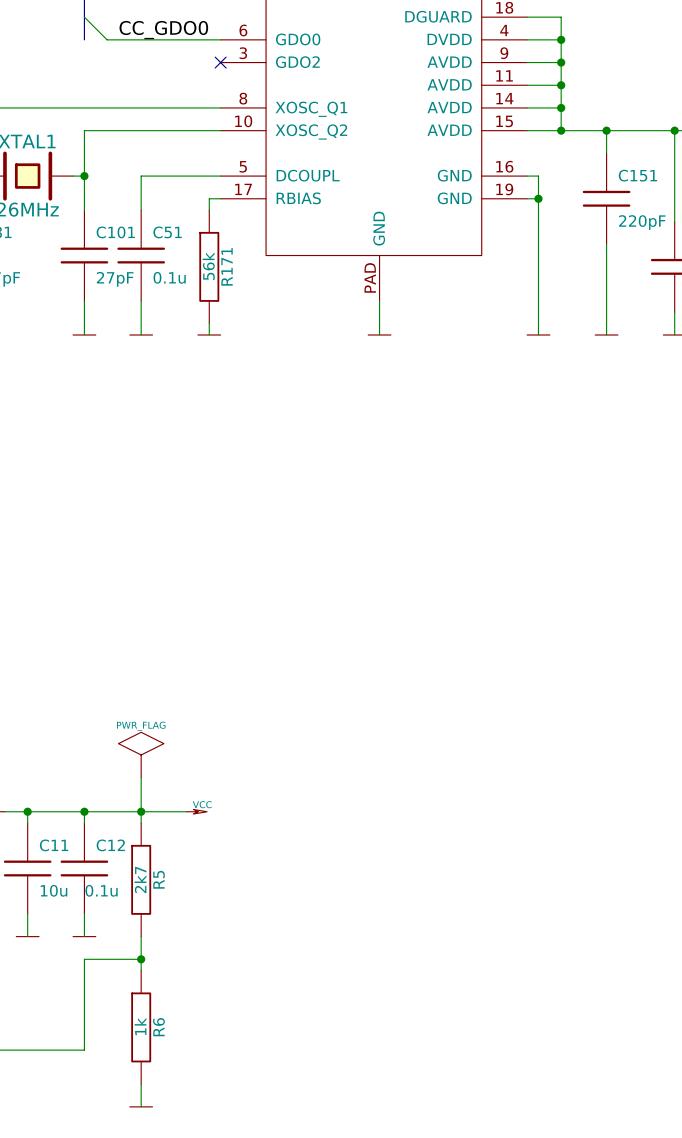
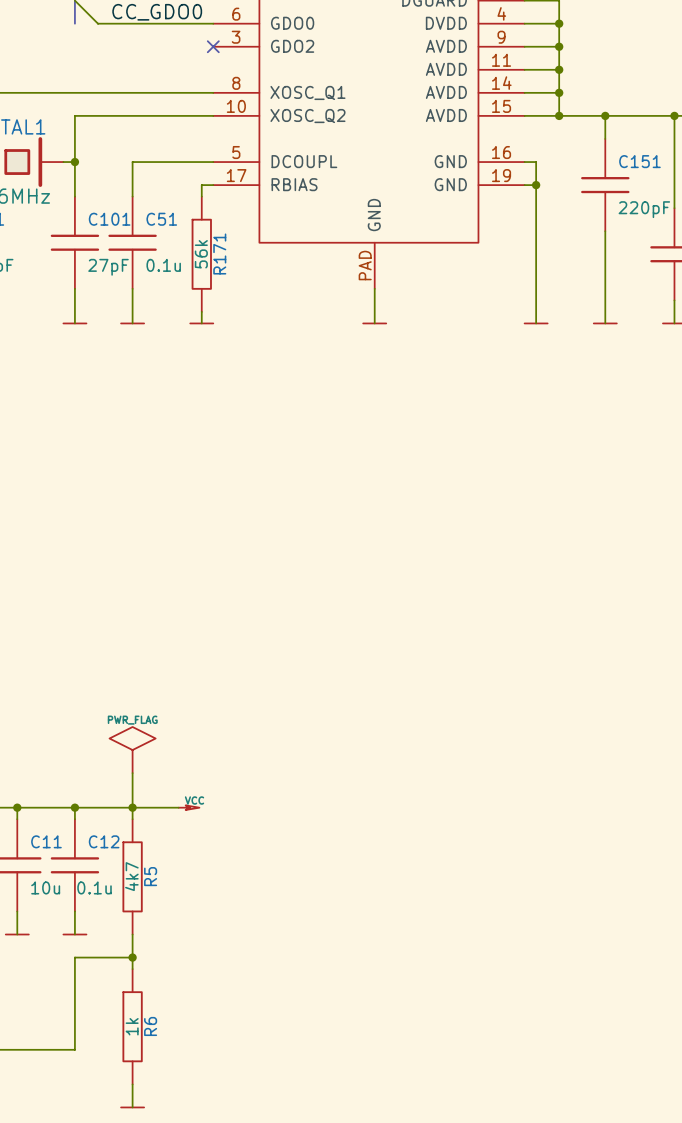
R5 value: 2k7 (140, 879) -> 4k7 (131, 876)

